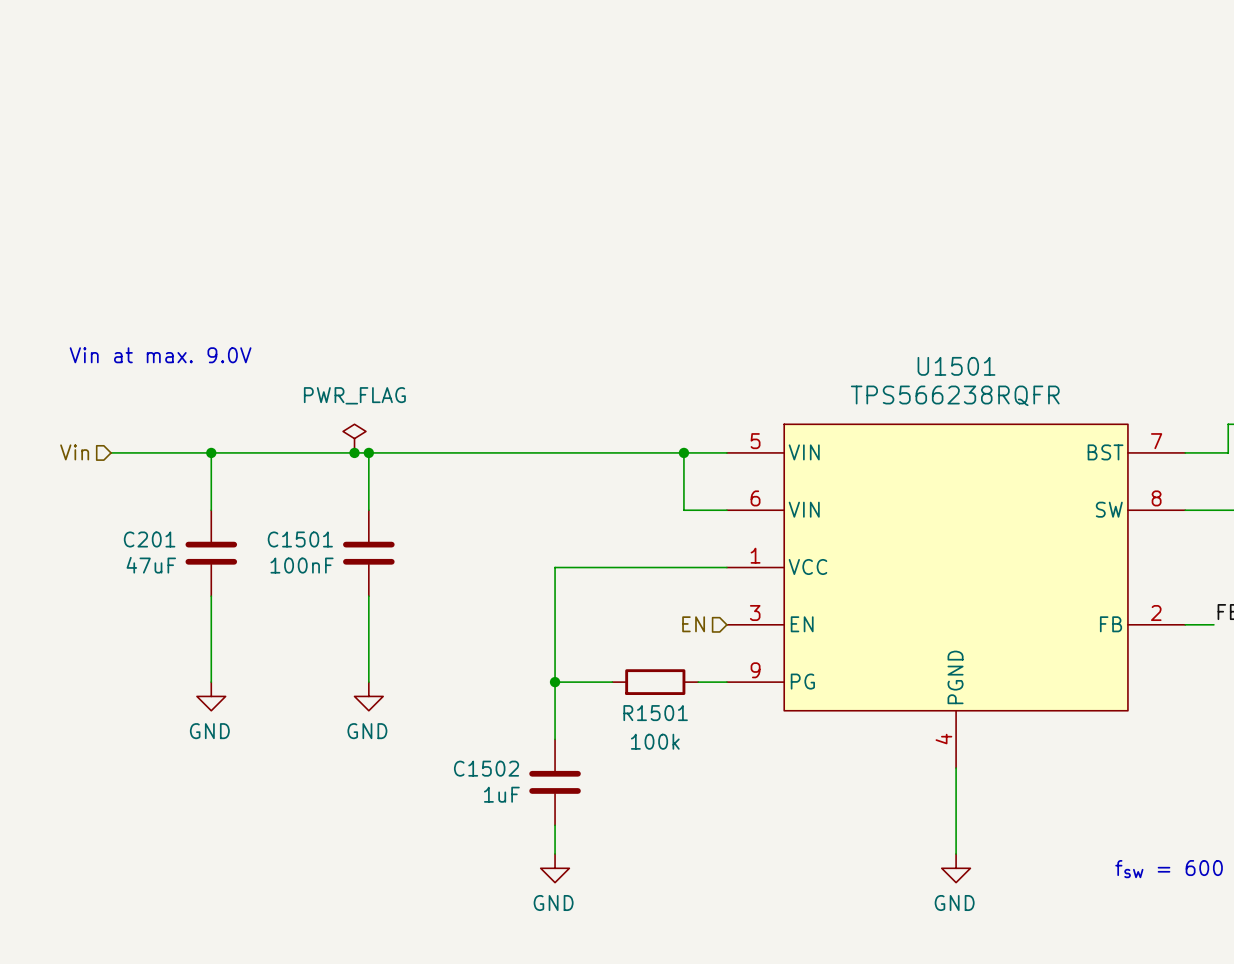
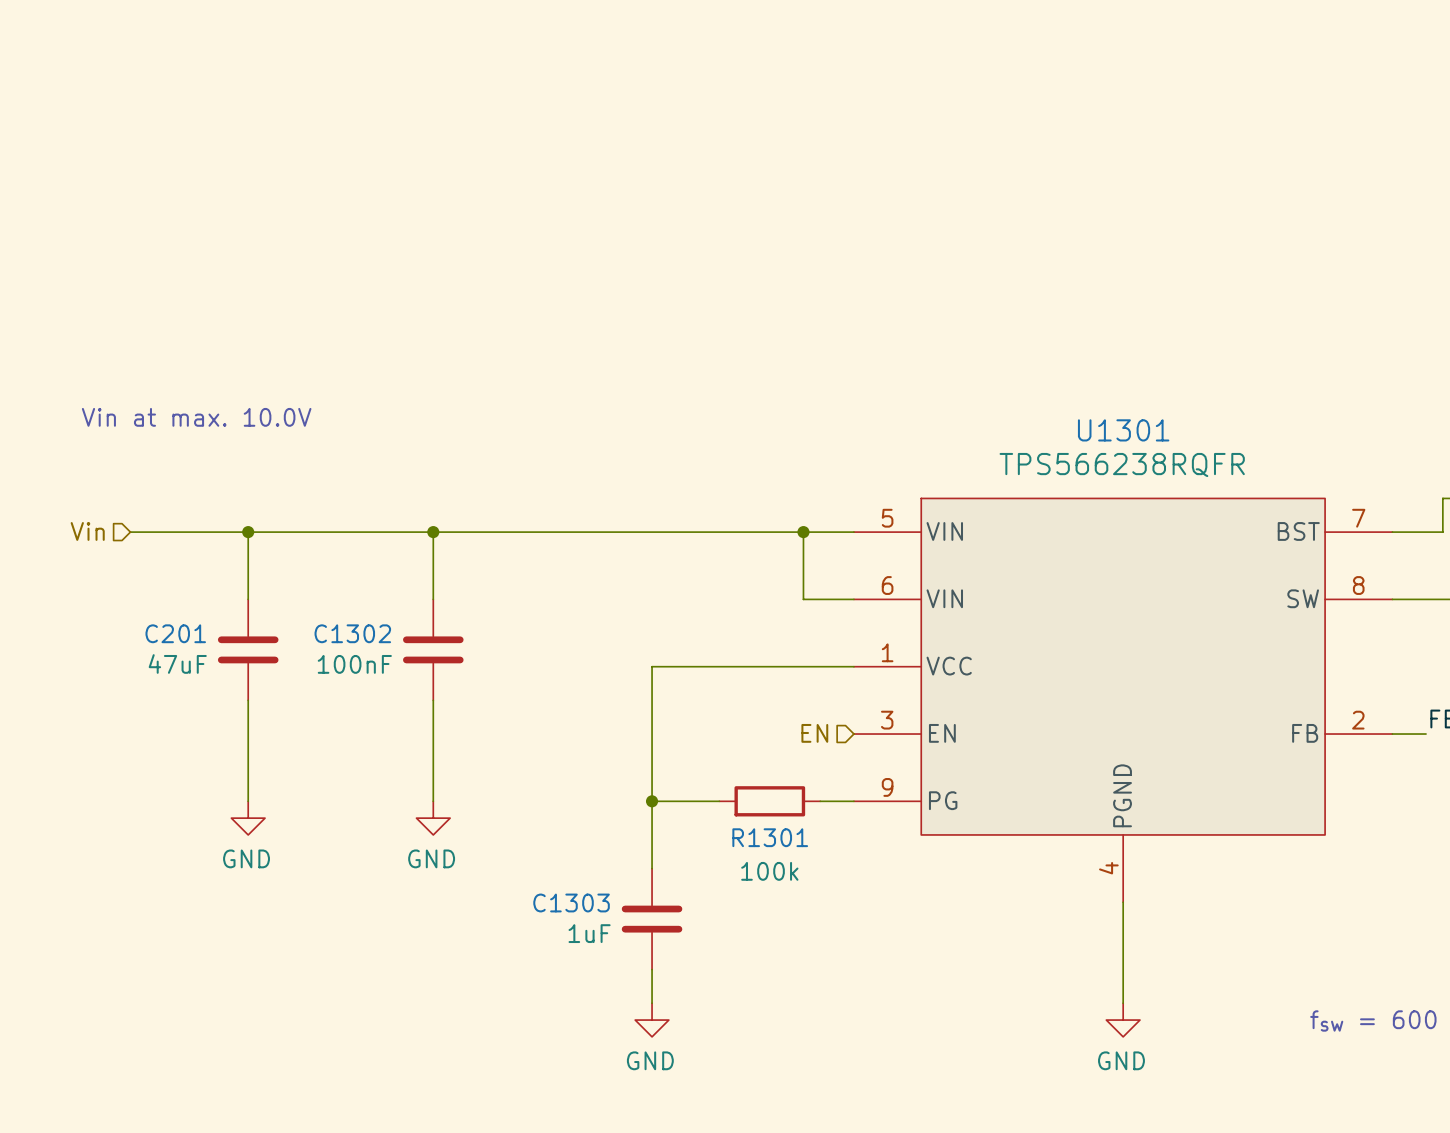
text: Vin at max. 9.0V (160, 355) -> Vin at max. 10.0V (196, 417)
U1501 name: U1501 (956, 366) -> U1301 (1123, 430)
power symbol: PWR_FLAG (354, 438) -> none
junction: (354, 452) -> none
C1501 name: C1501 (300, 539) -> C1302 (352, 633)
R1501 name: R1501 (655, 713) -> R1301 (770, 837)
C1502 name: C1502 (486, 768) -> C1303 (571, 902)

